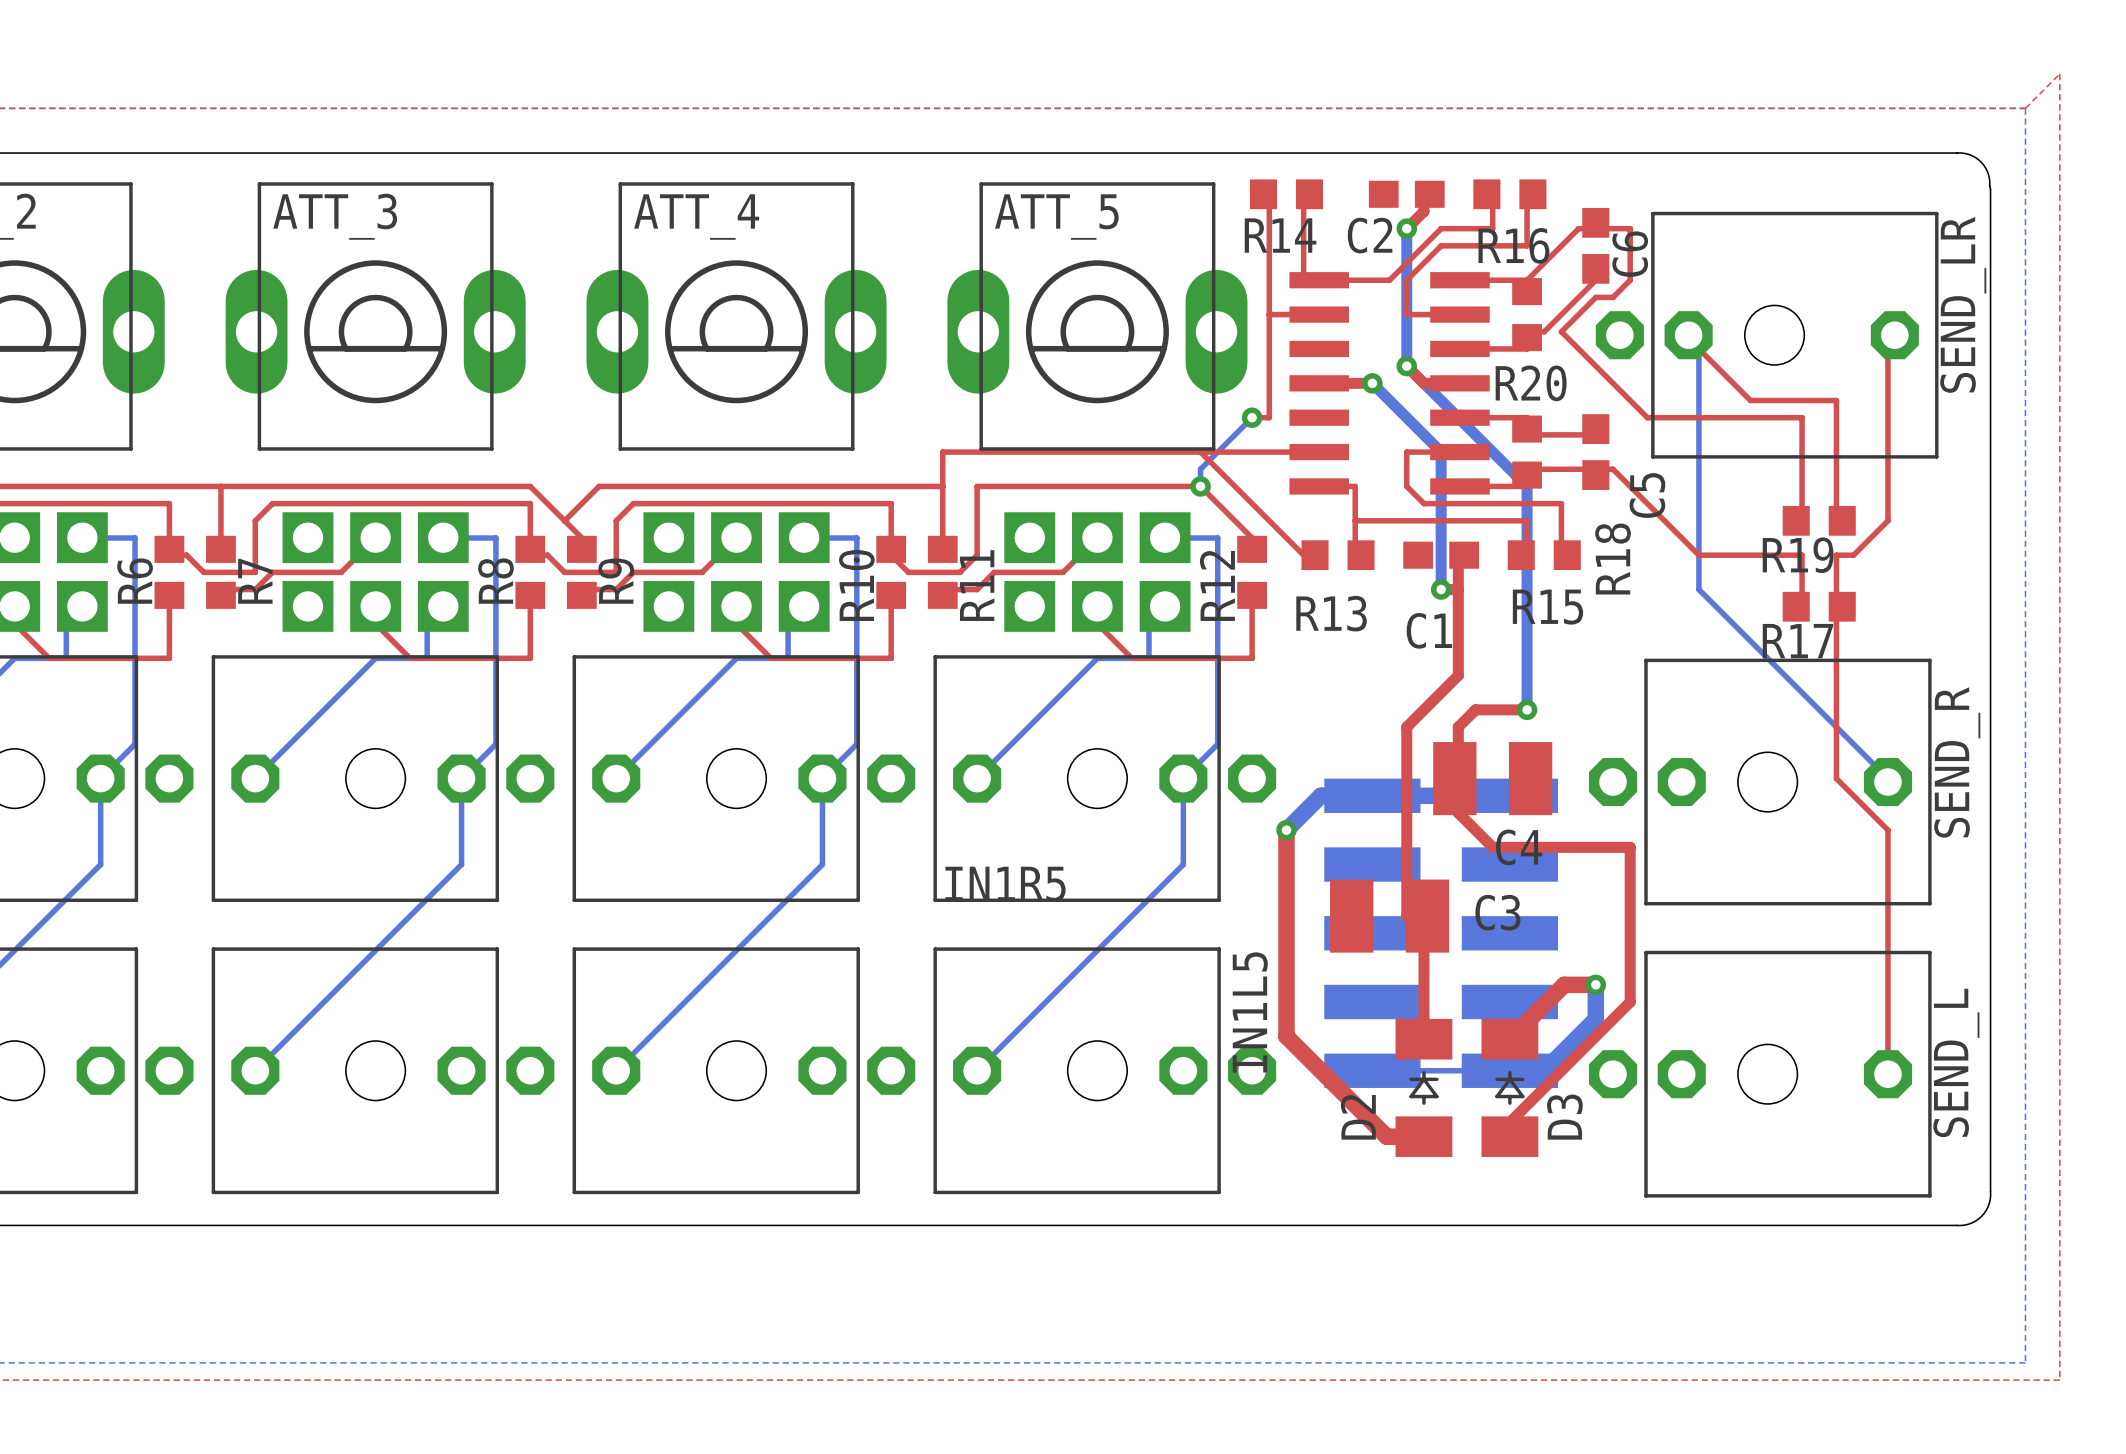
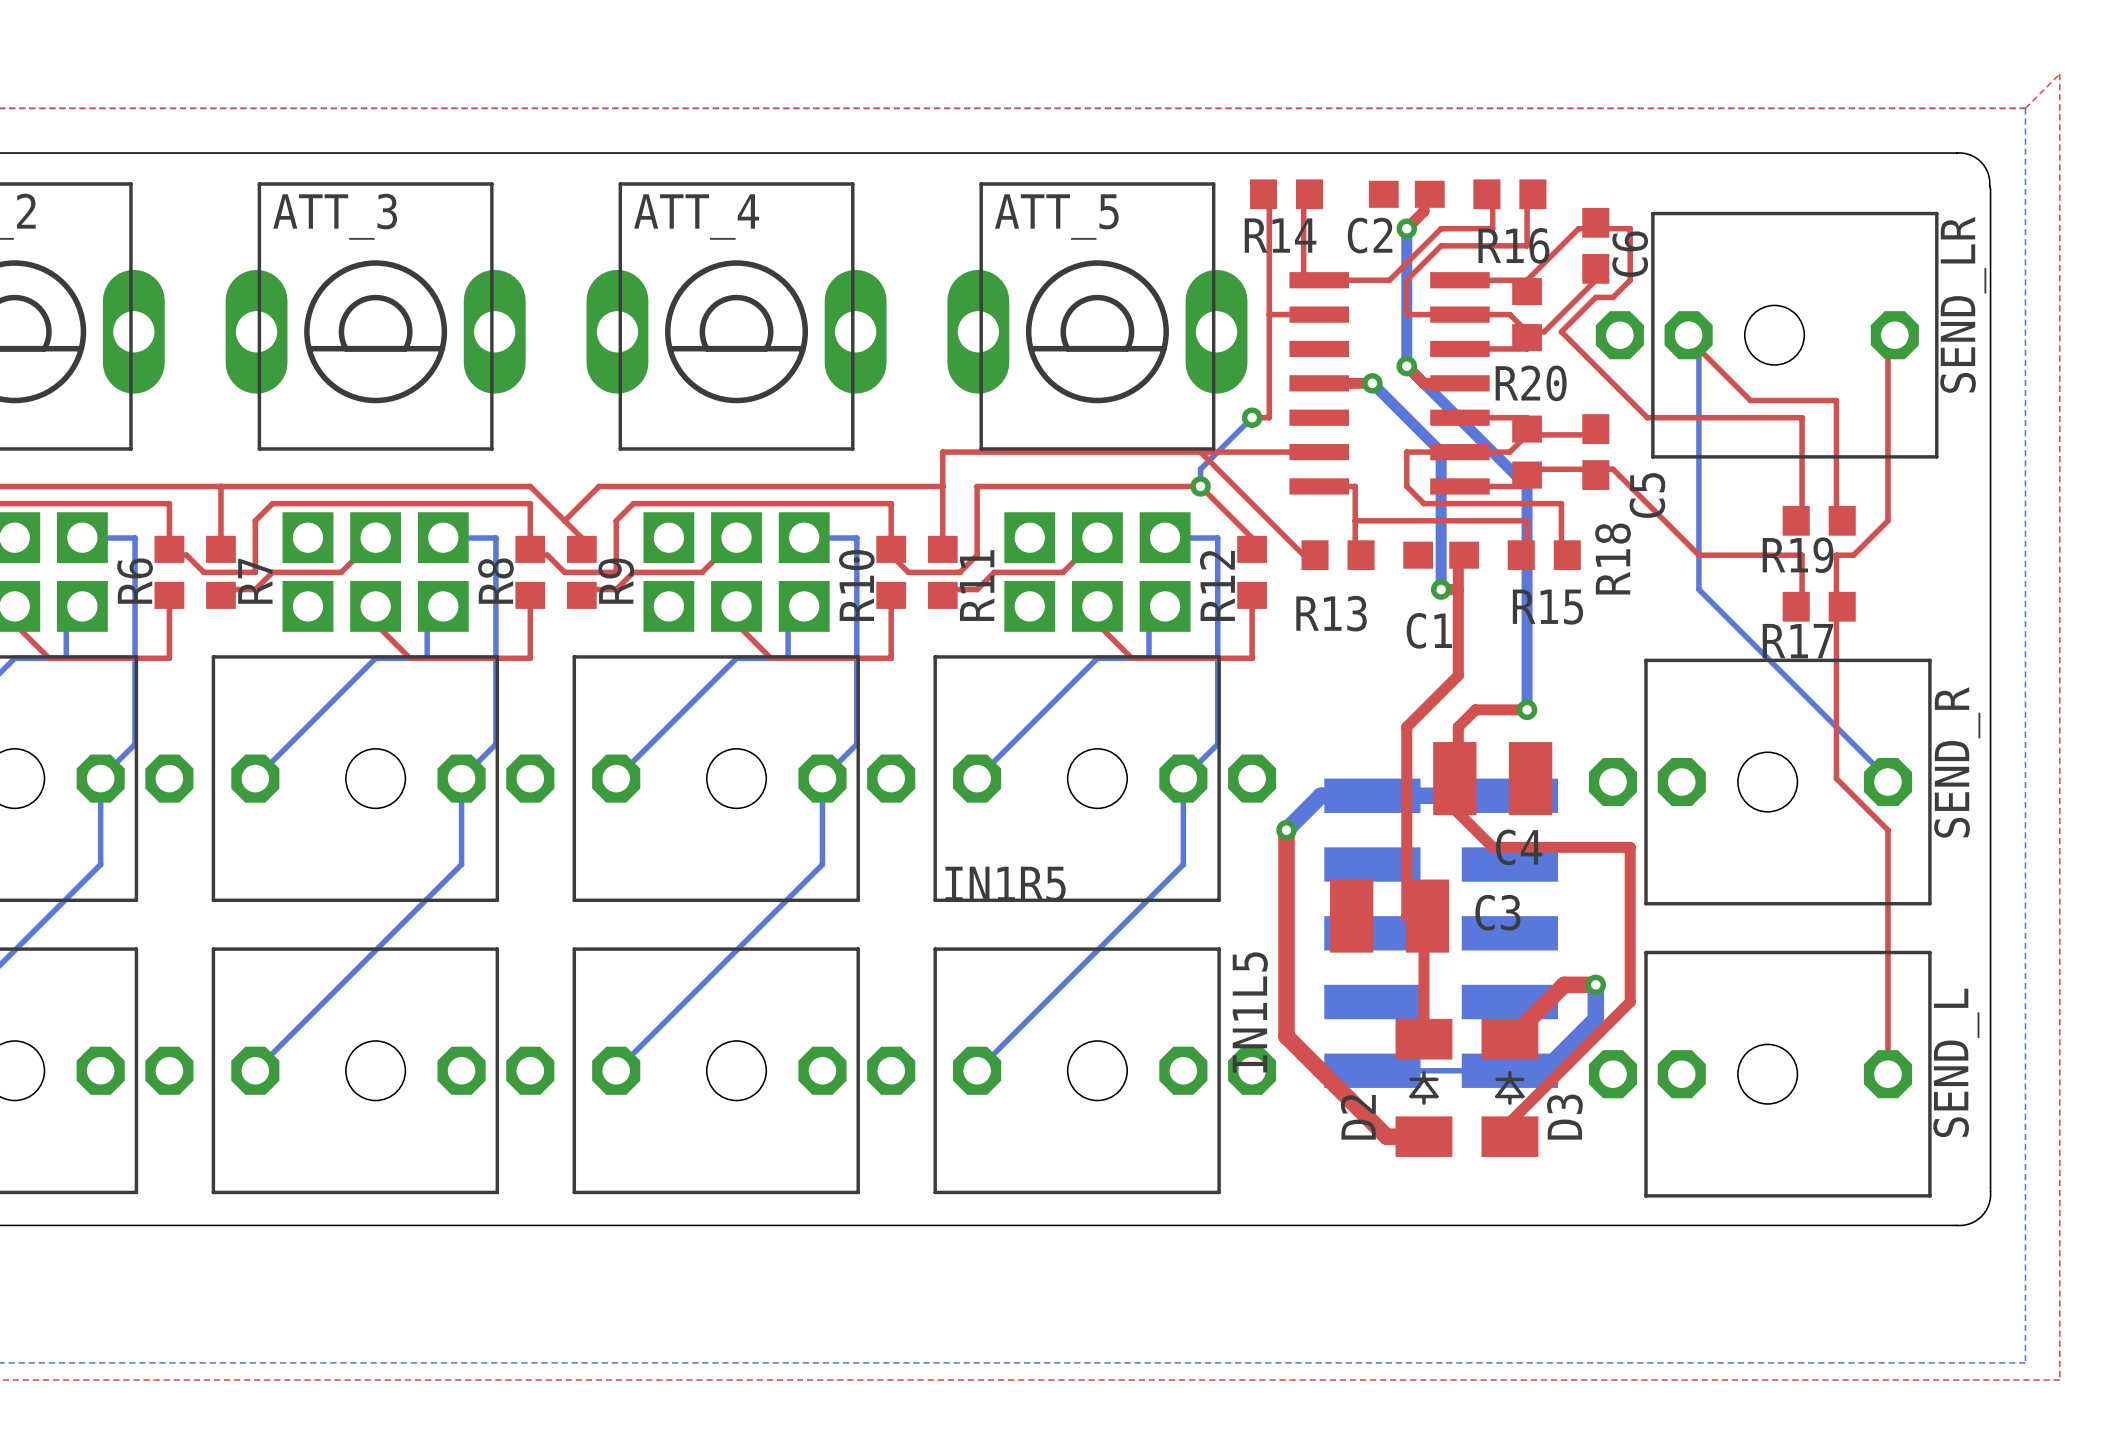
top track: none -> (1459, 314) (1509, 314) (1527, 331)
top track: none -> (1527, 434) (1509, 452) (1459, 452)

